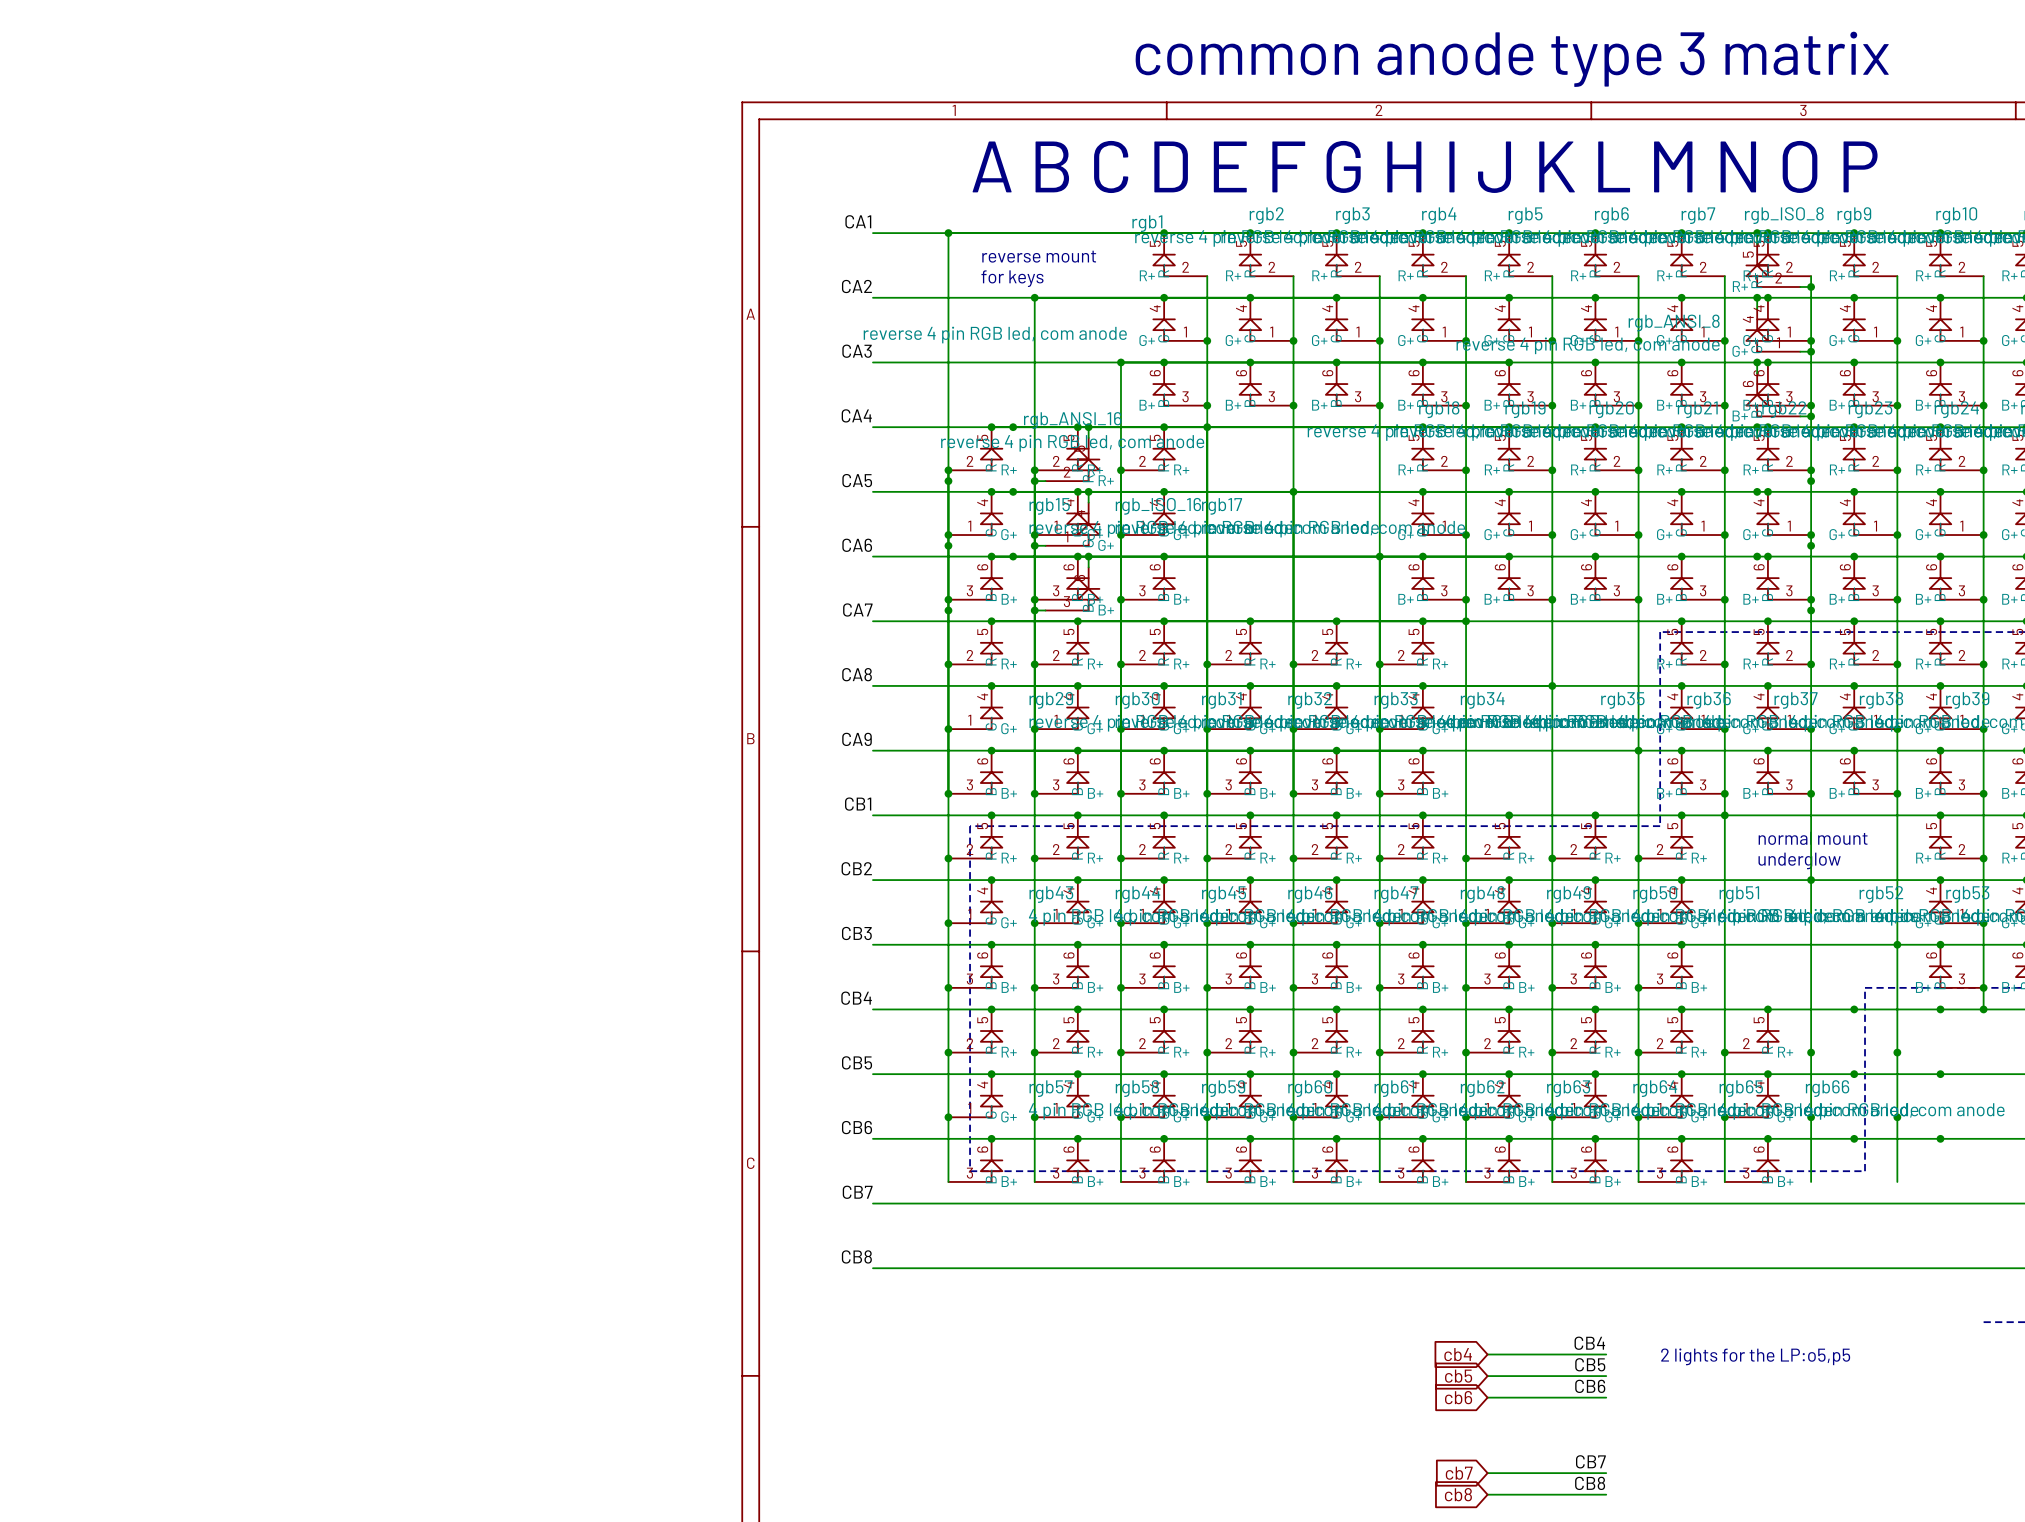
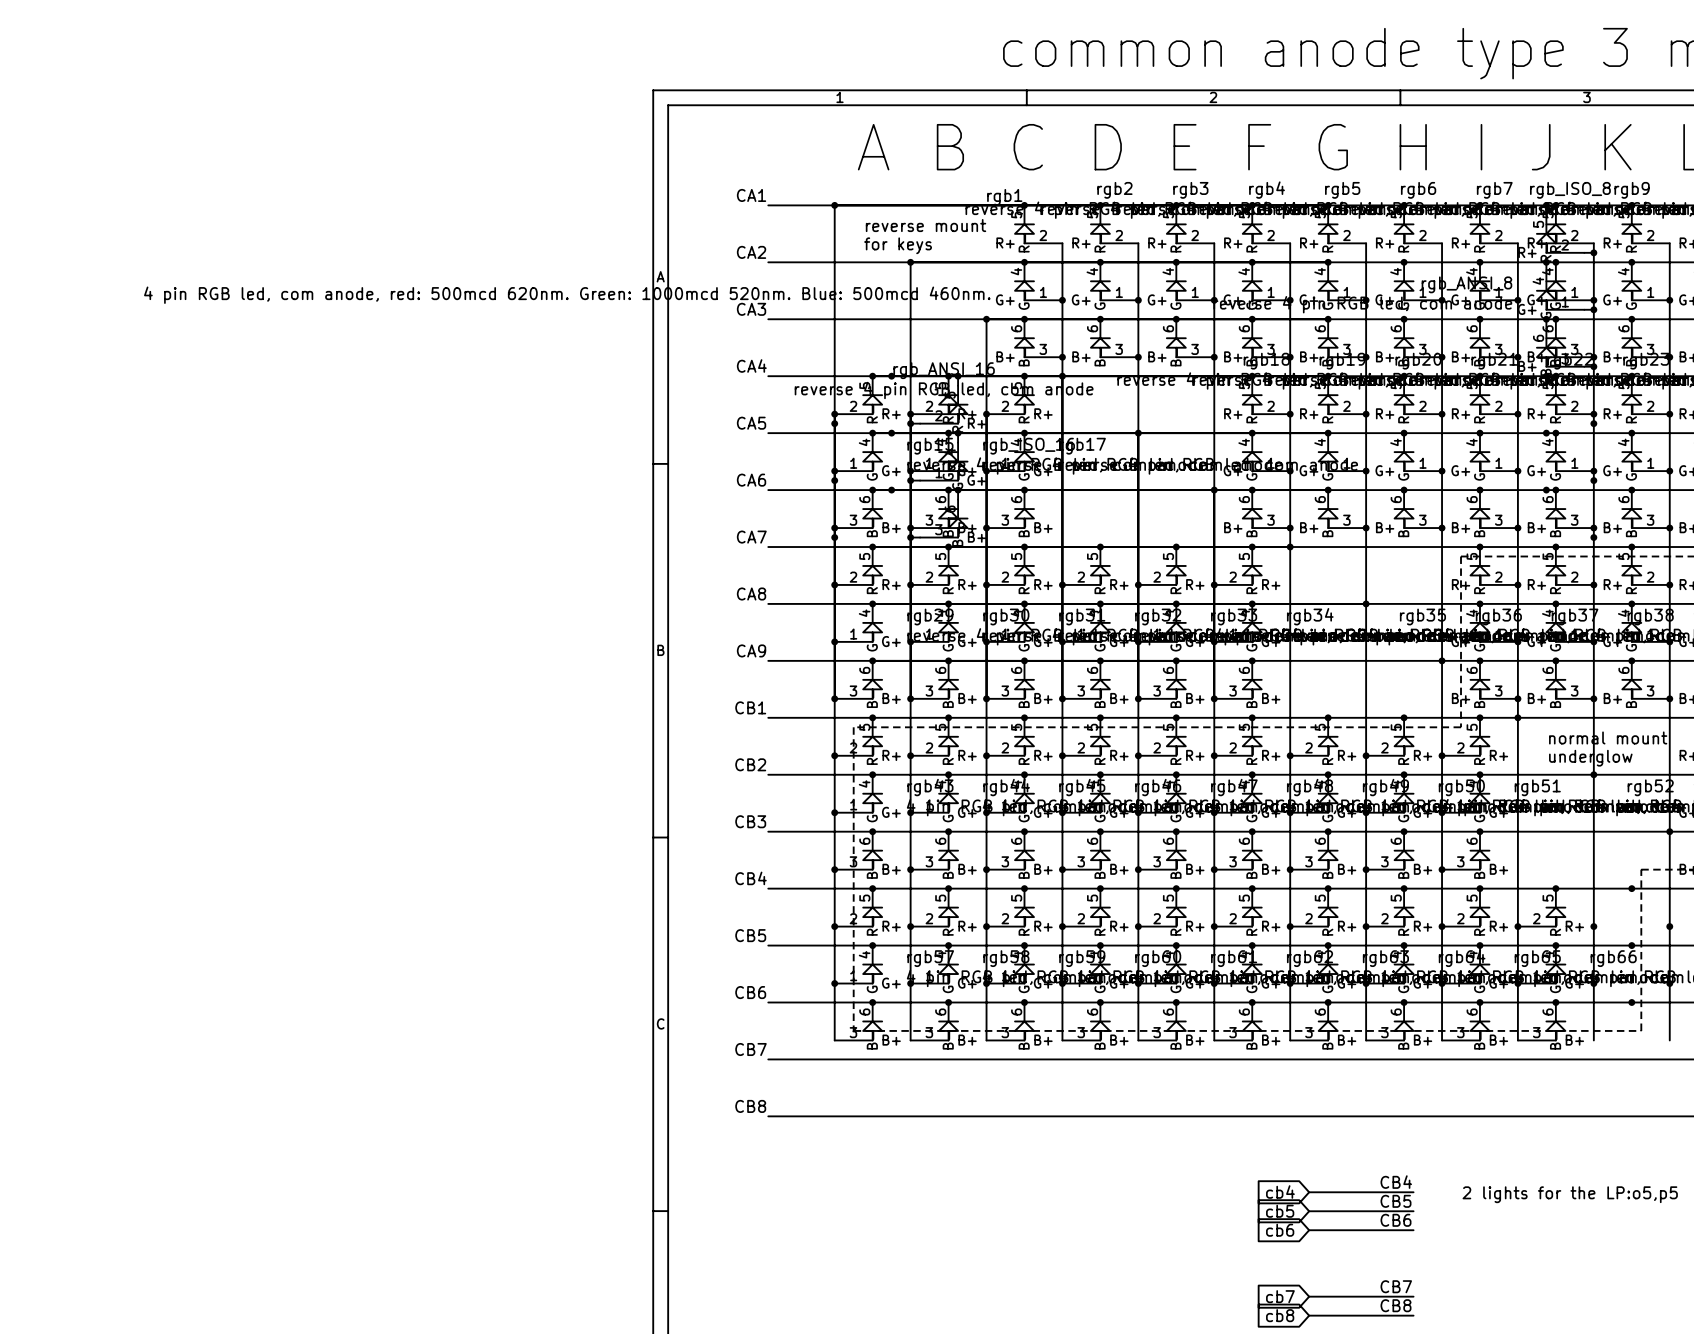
rgb1 value: reverse 4 pin RGB led, com anode (995, 335) -> 4 pin RGB led, com anode, red: 500mcd 620nm. Green: 1000mcd 520nm. Blue: 500mcd 460nm. (567, 295)

